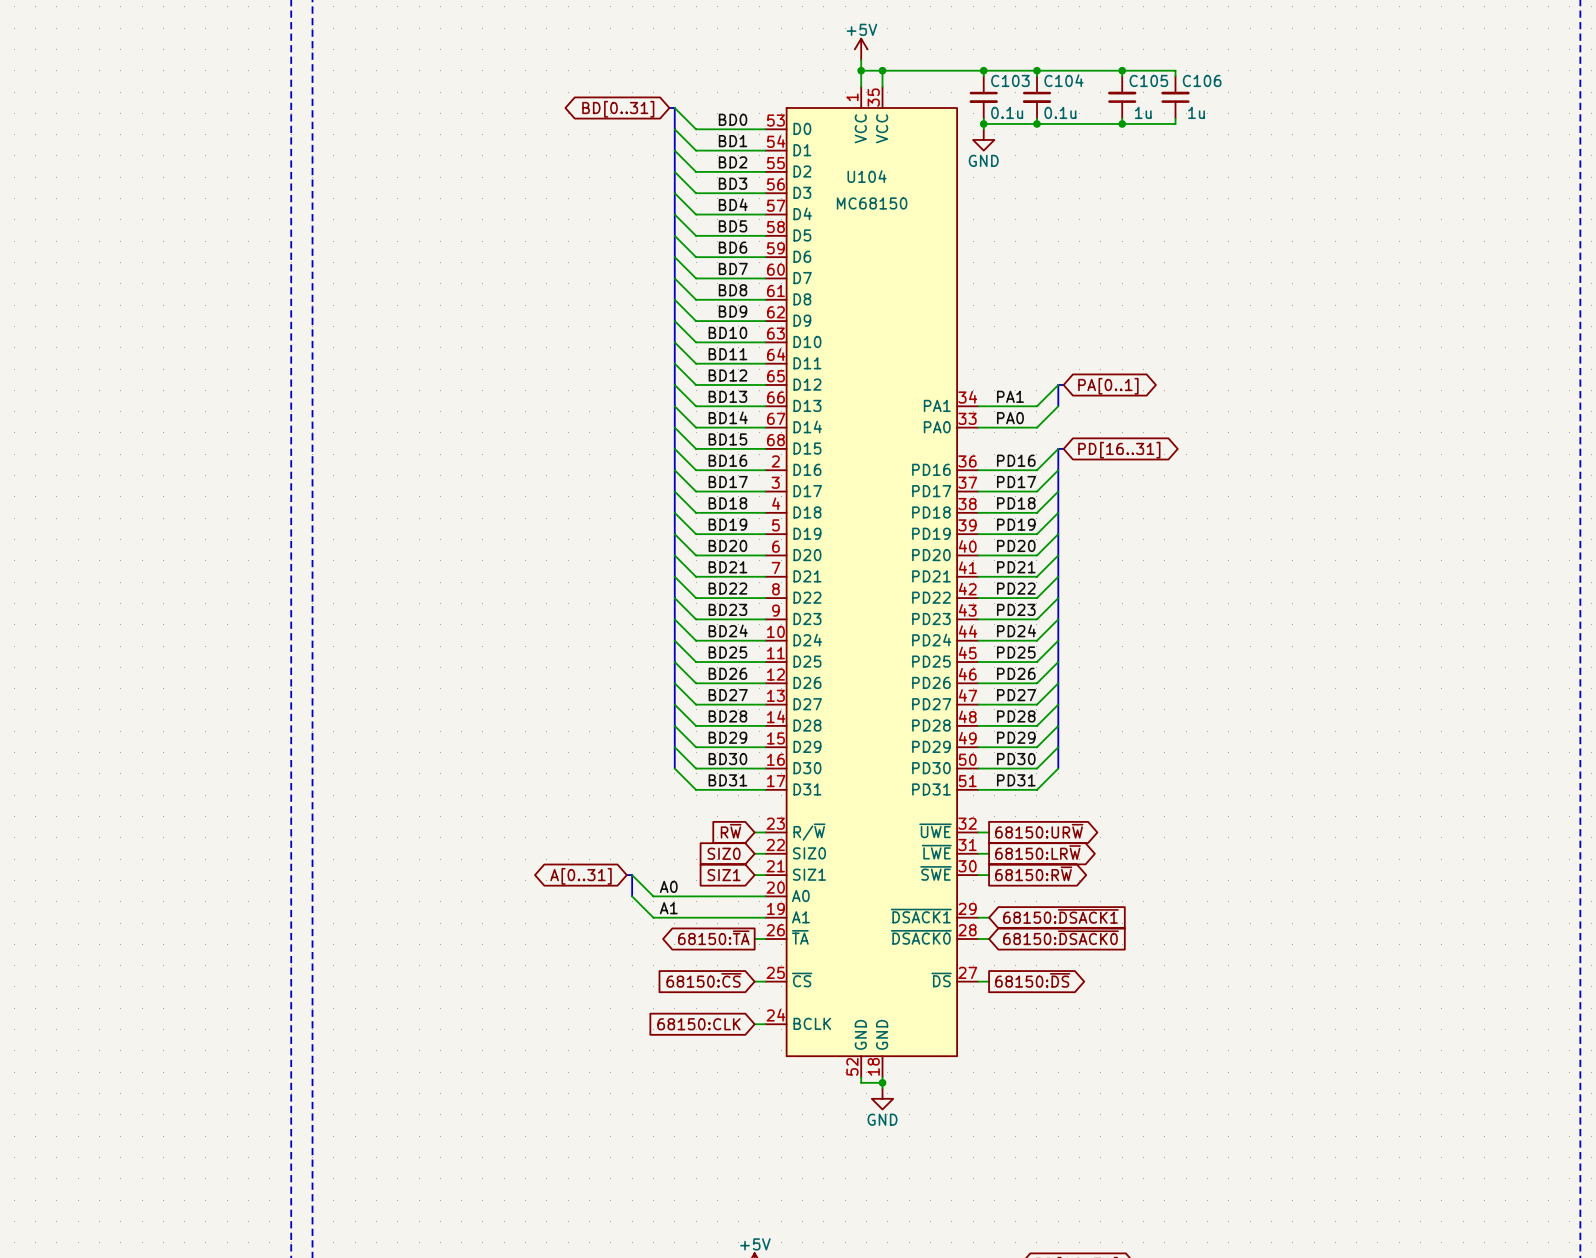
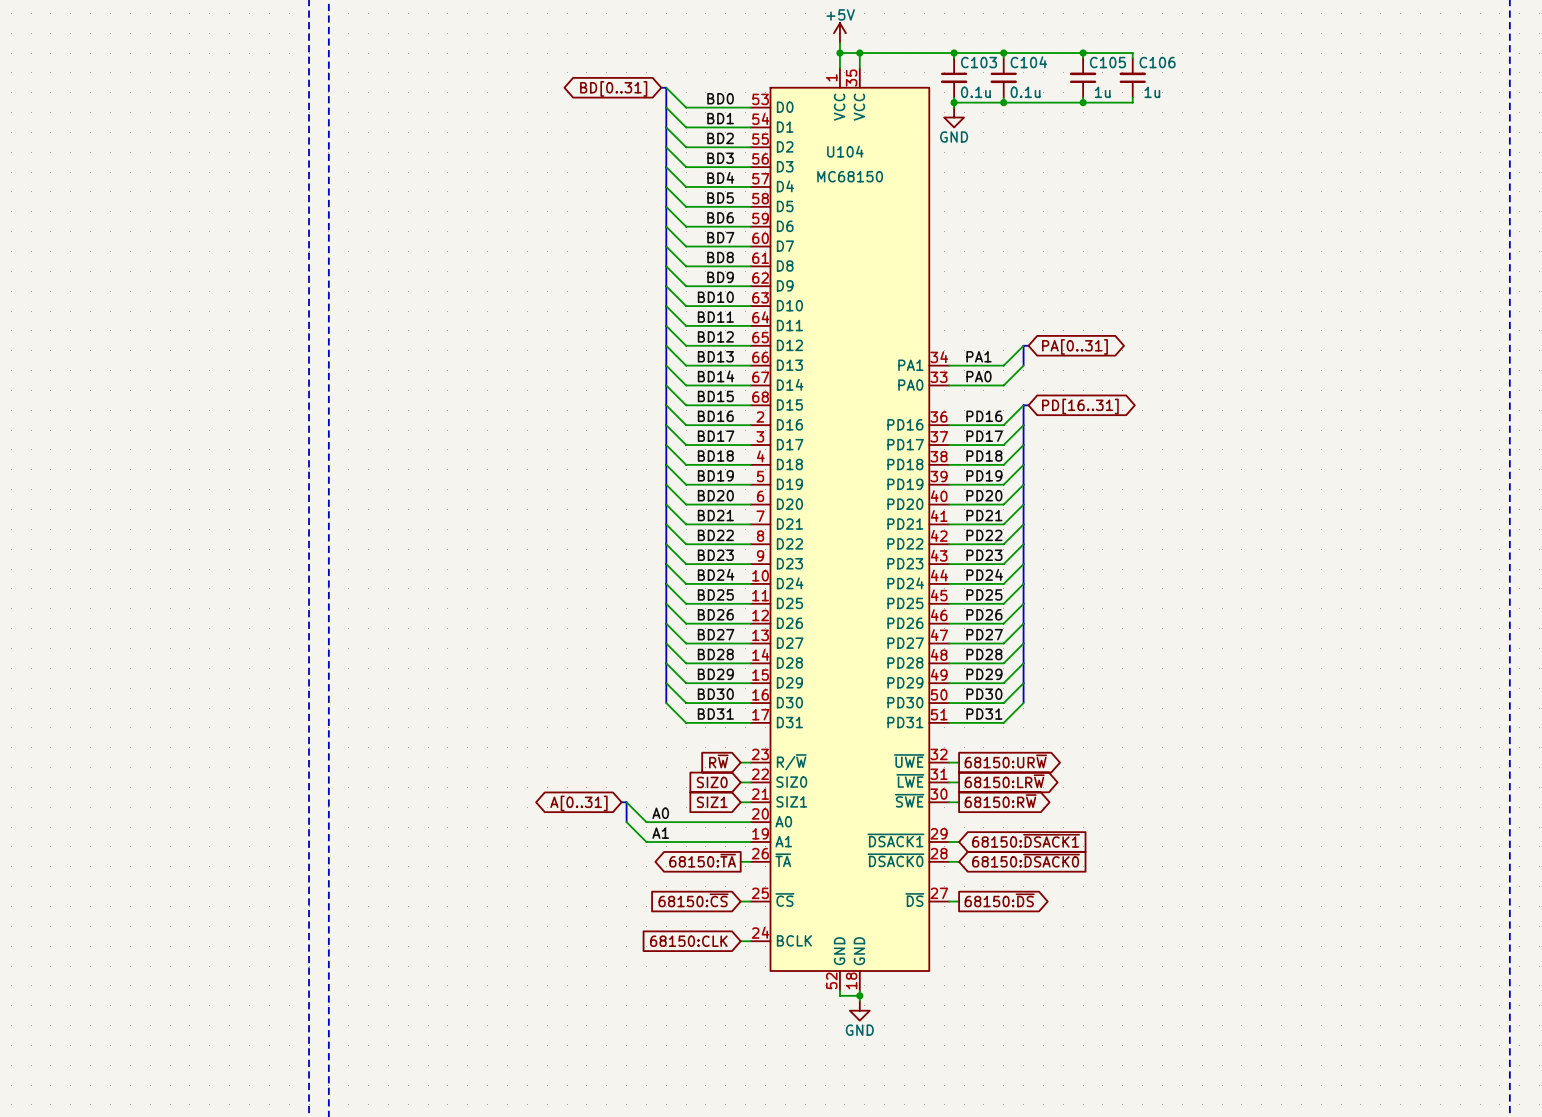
global label: PA[0..1] (1108, 386) -> PA[0..31] (1074, 346)

